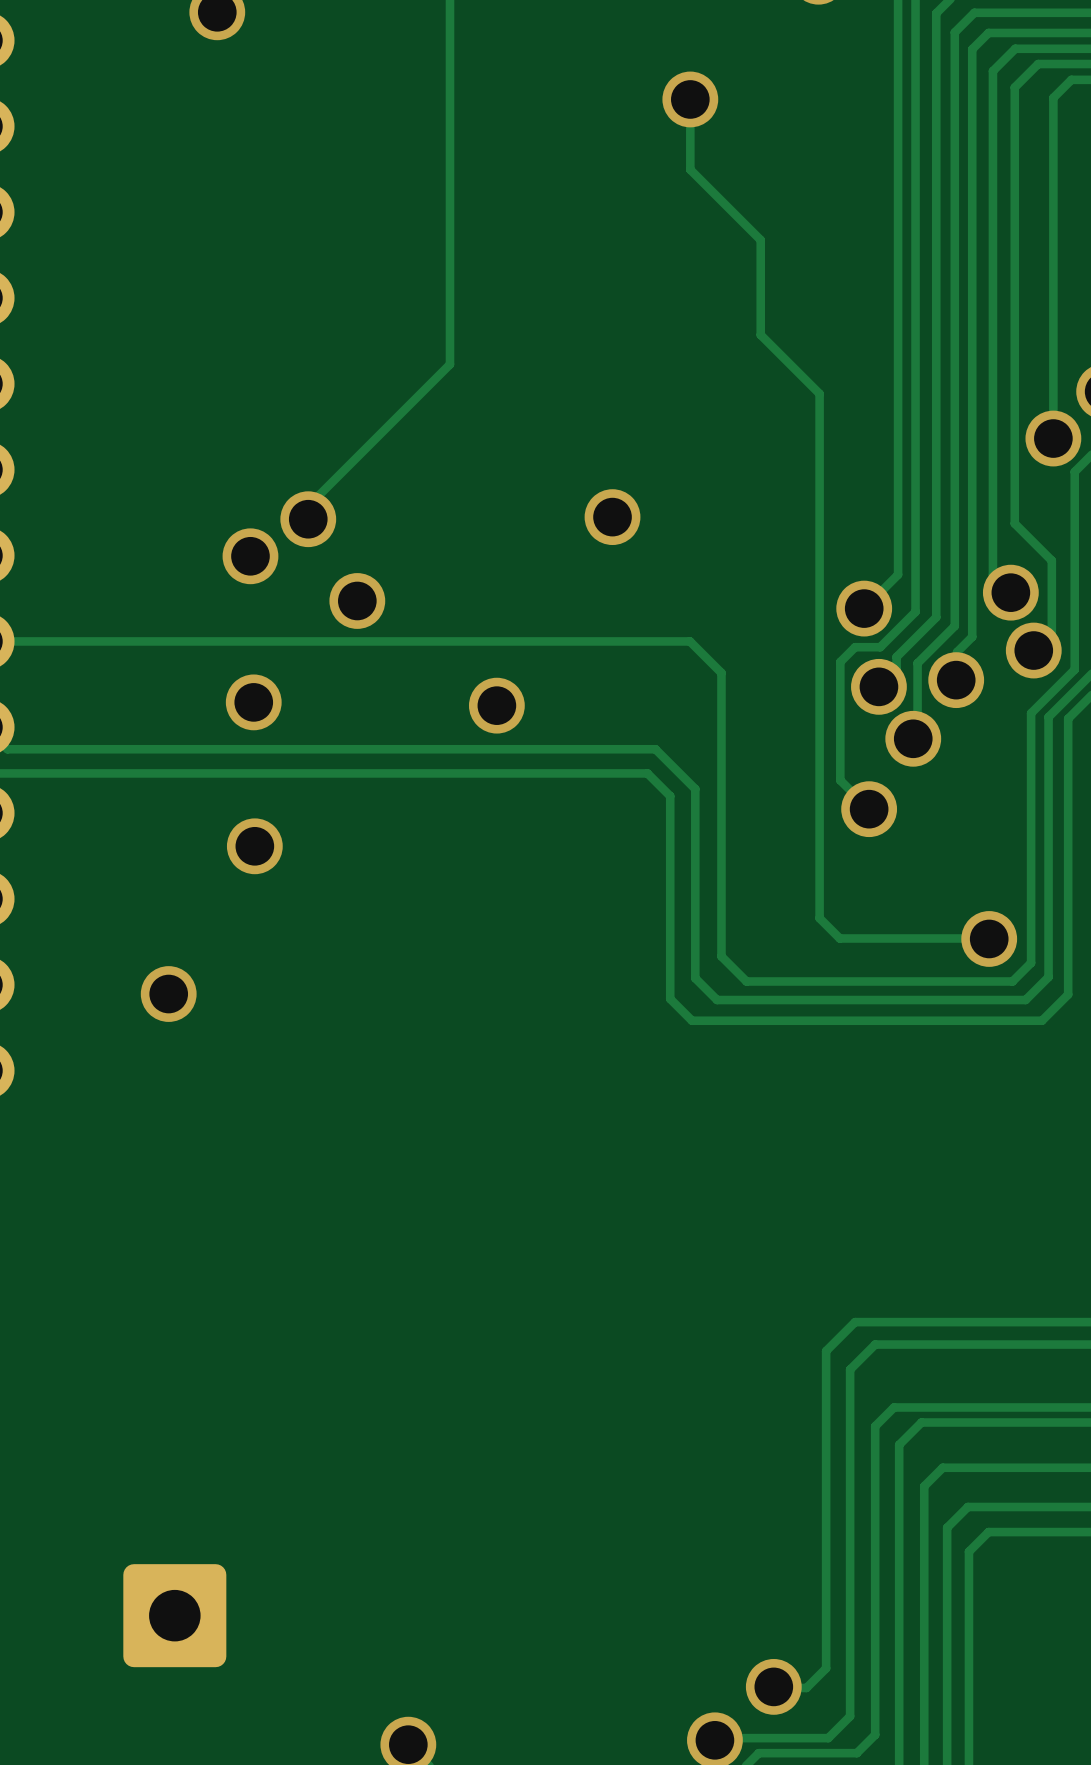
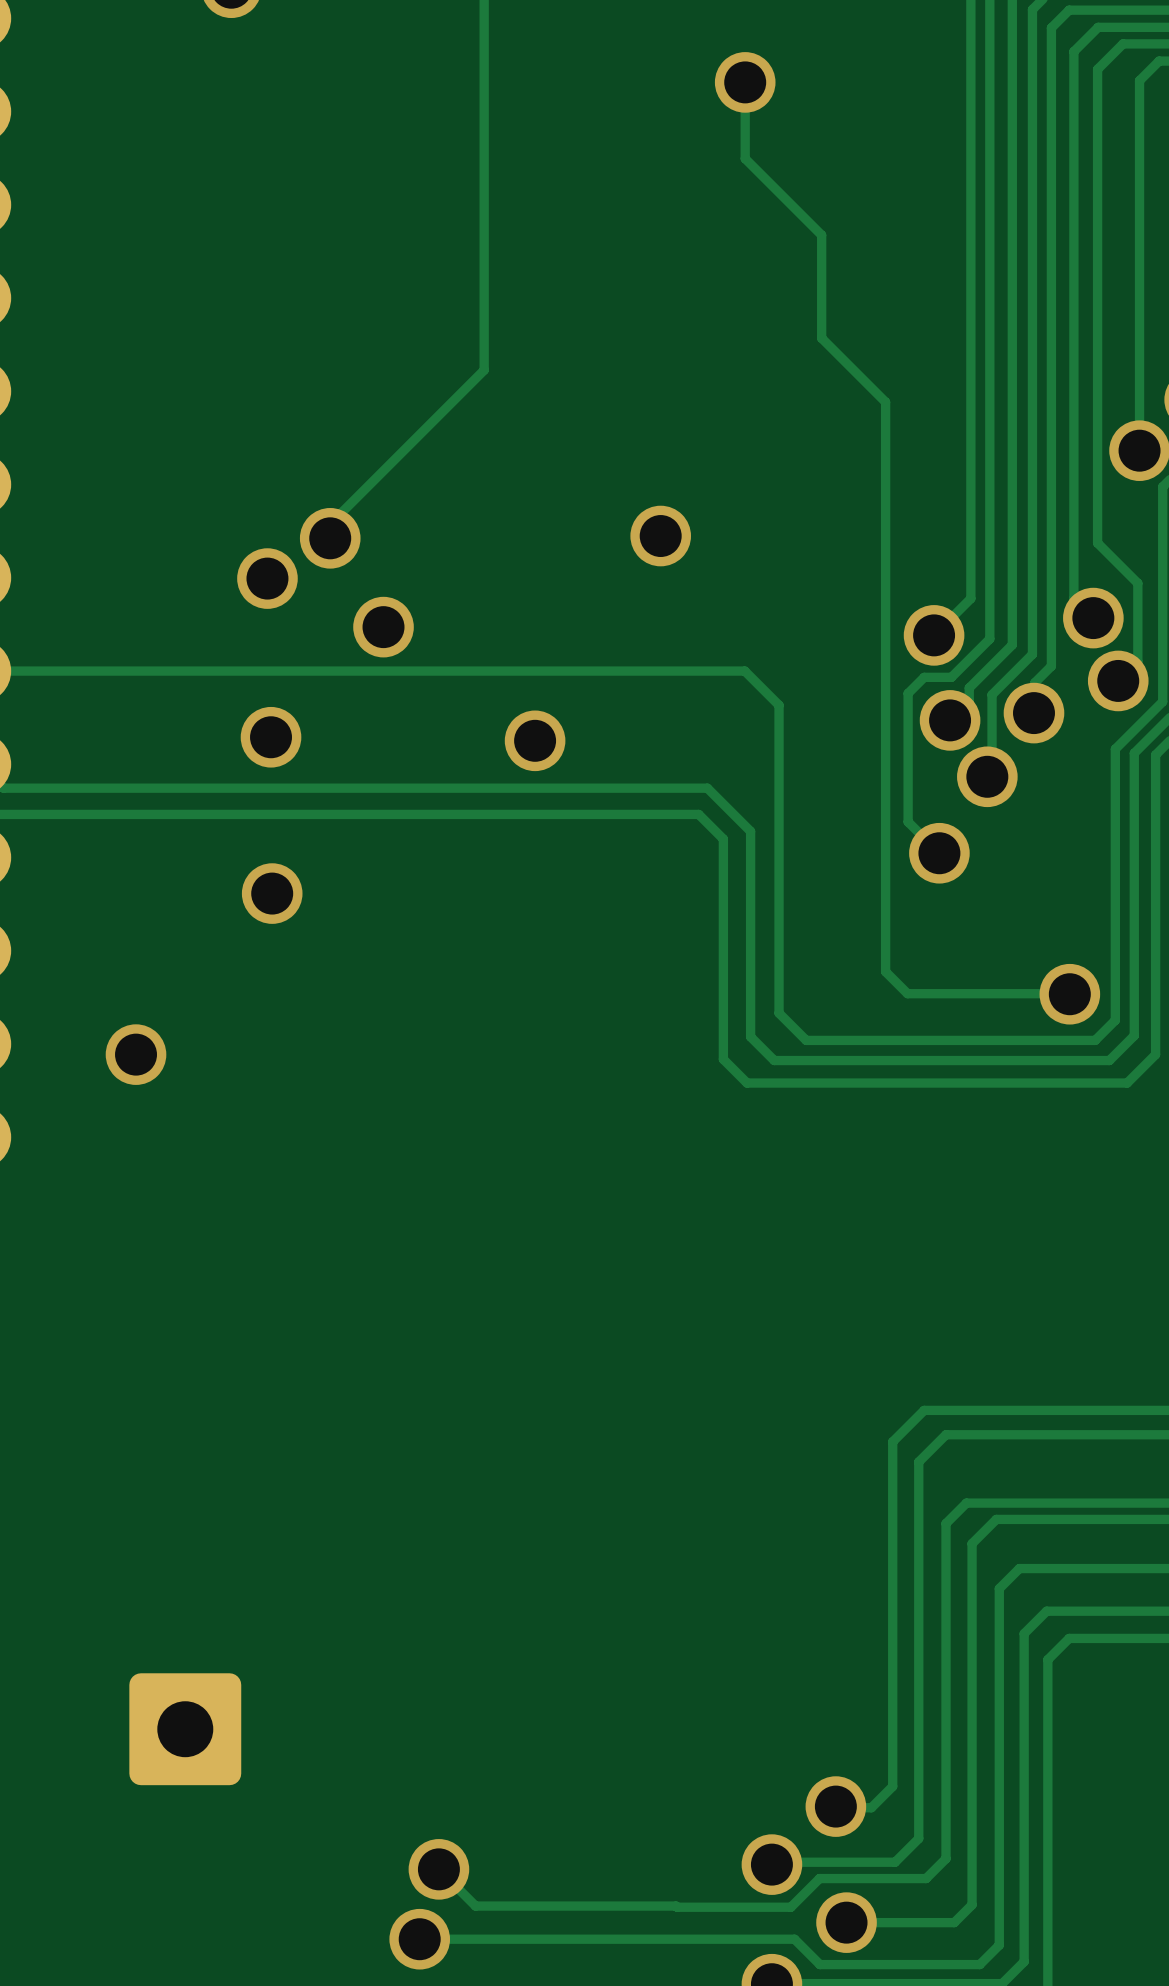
via position: (168, 994) -> (136, 1054)

